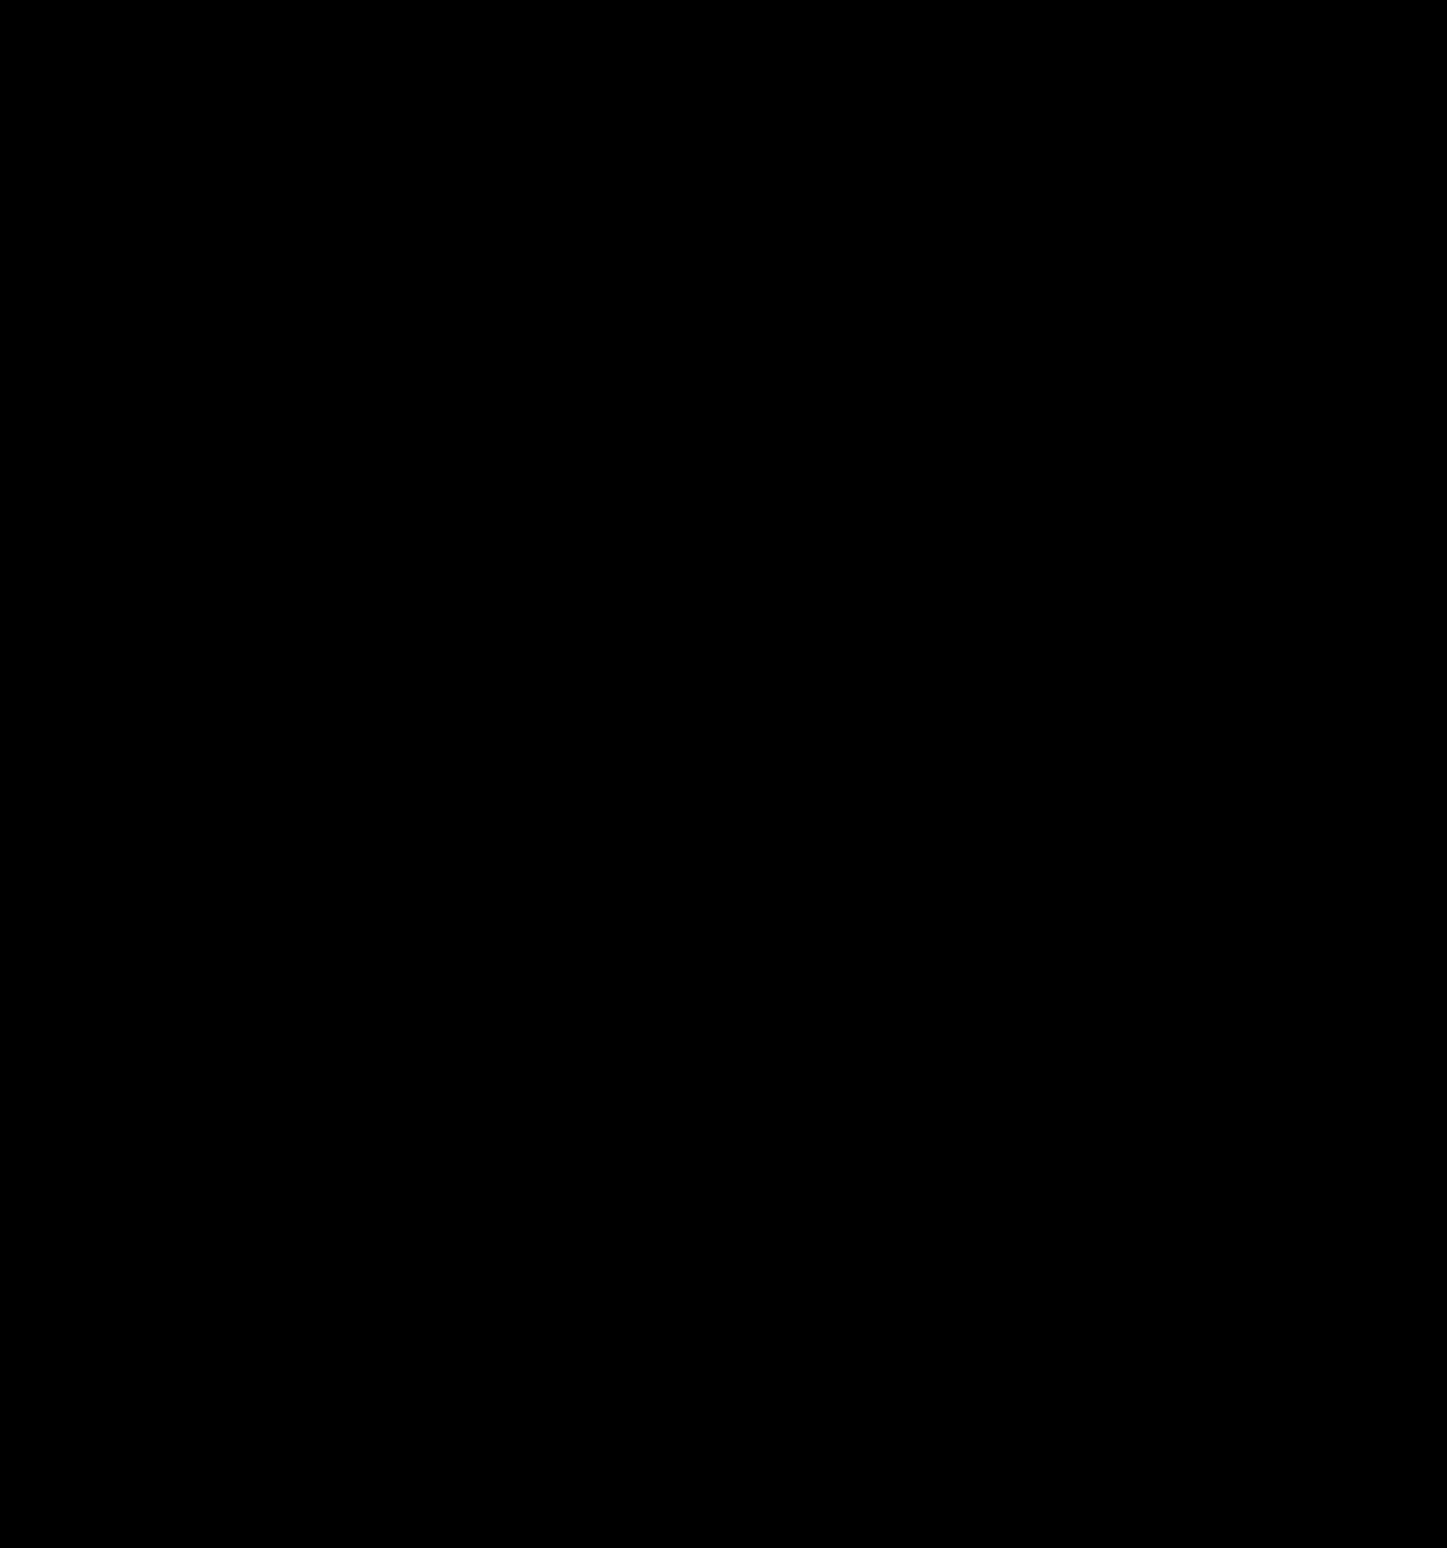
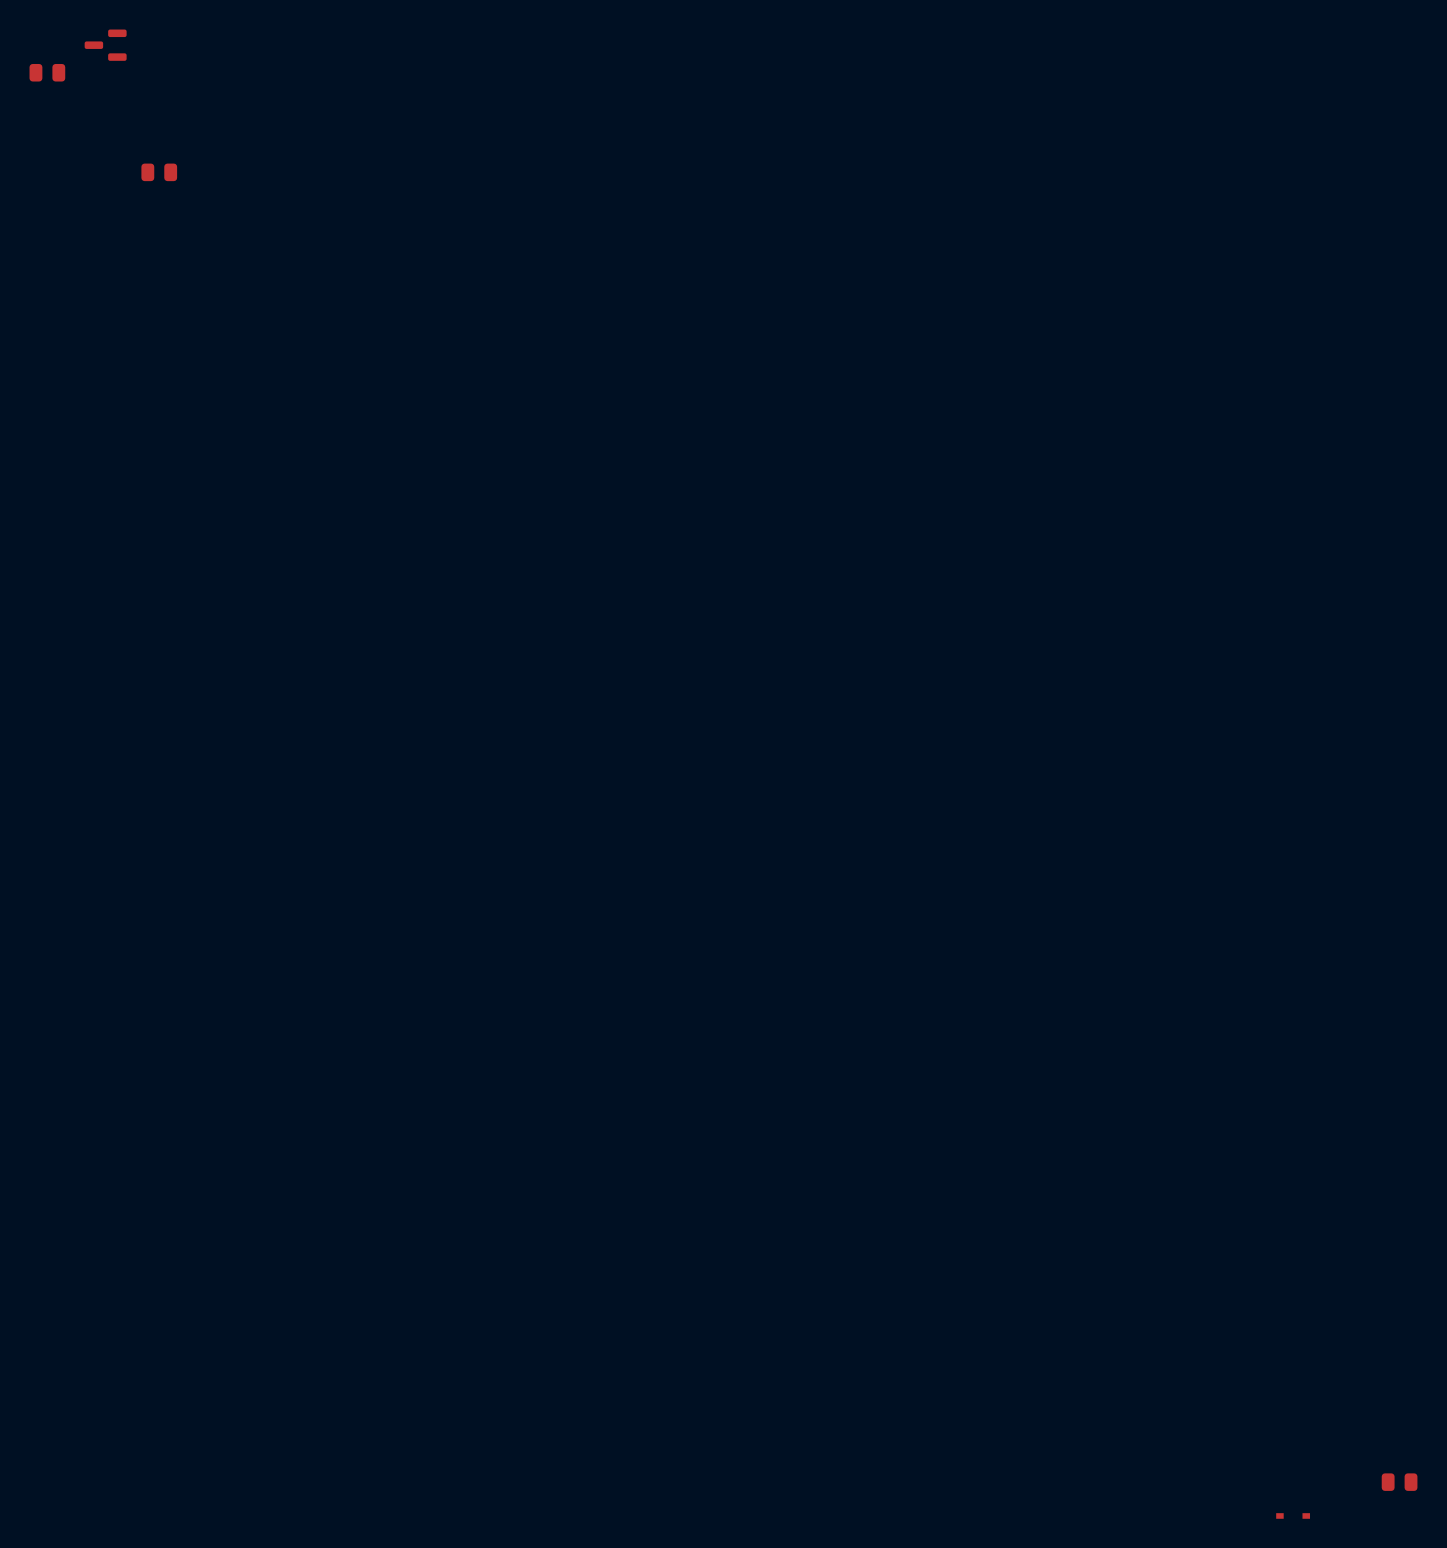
part: none -> (105, 45)
part: none -> (47, 72)
part: none -> (159, 172)
part: none -> (1399, 1482)
part: none -> (1293, 1515)

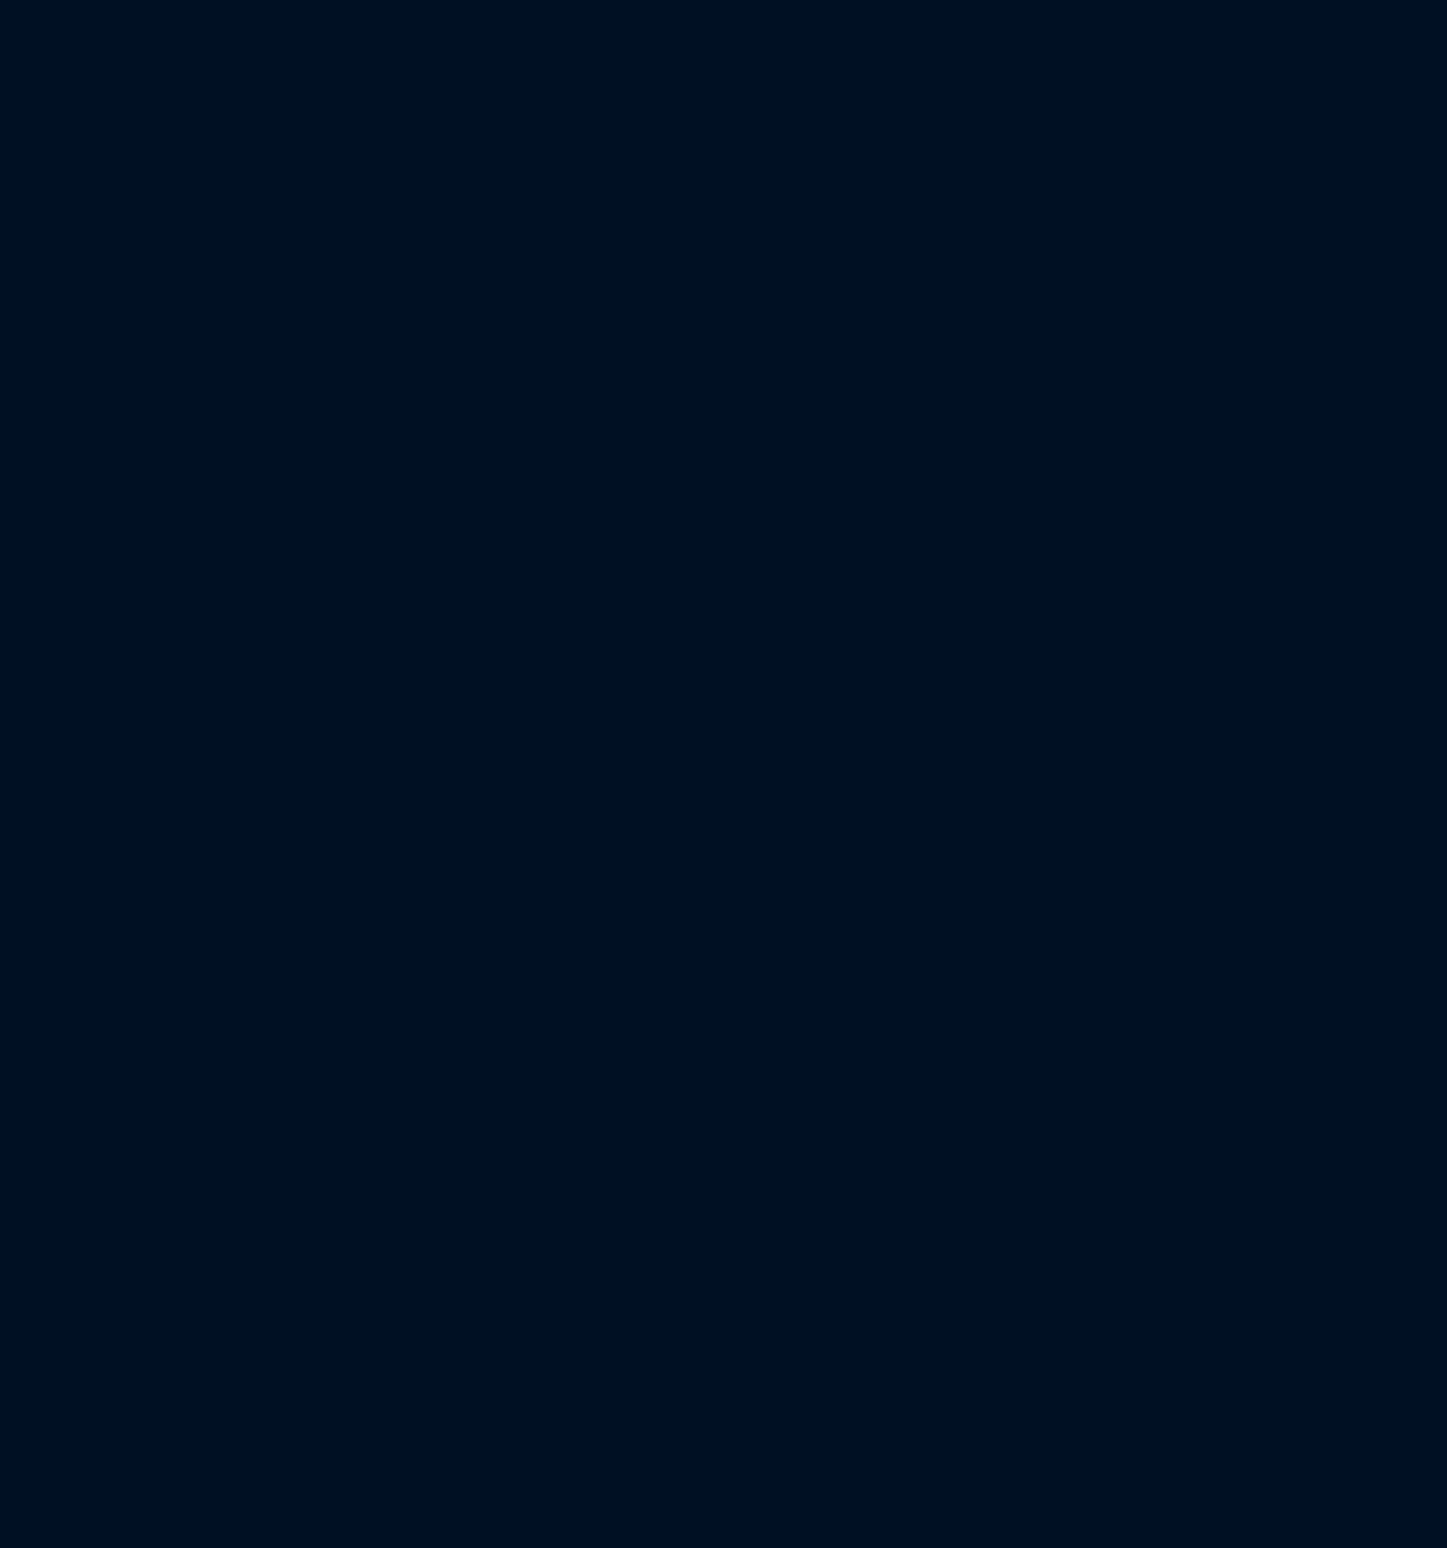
part: (105, 45) -> none
part: (47, 72) -> none
part: (159, 172) -> none
part: (1399, 1482) -> none
part: (1293, 1515) -> none

